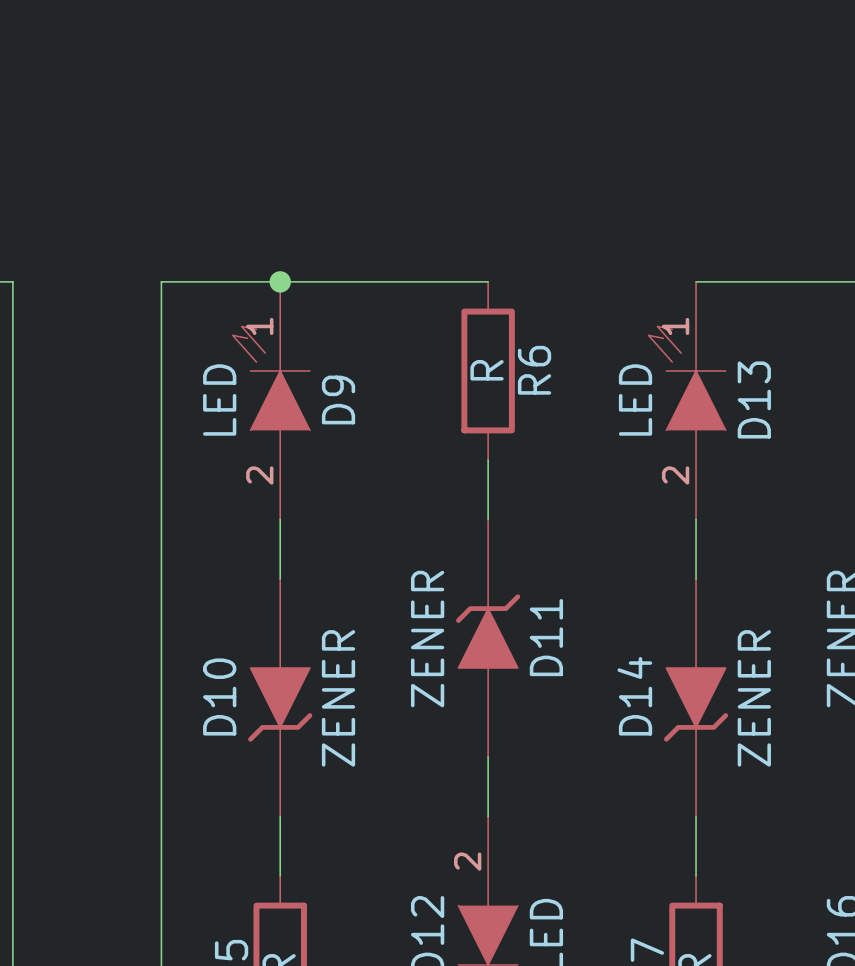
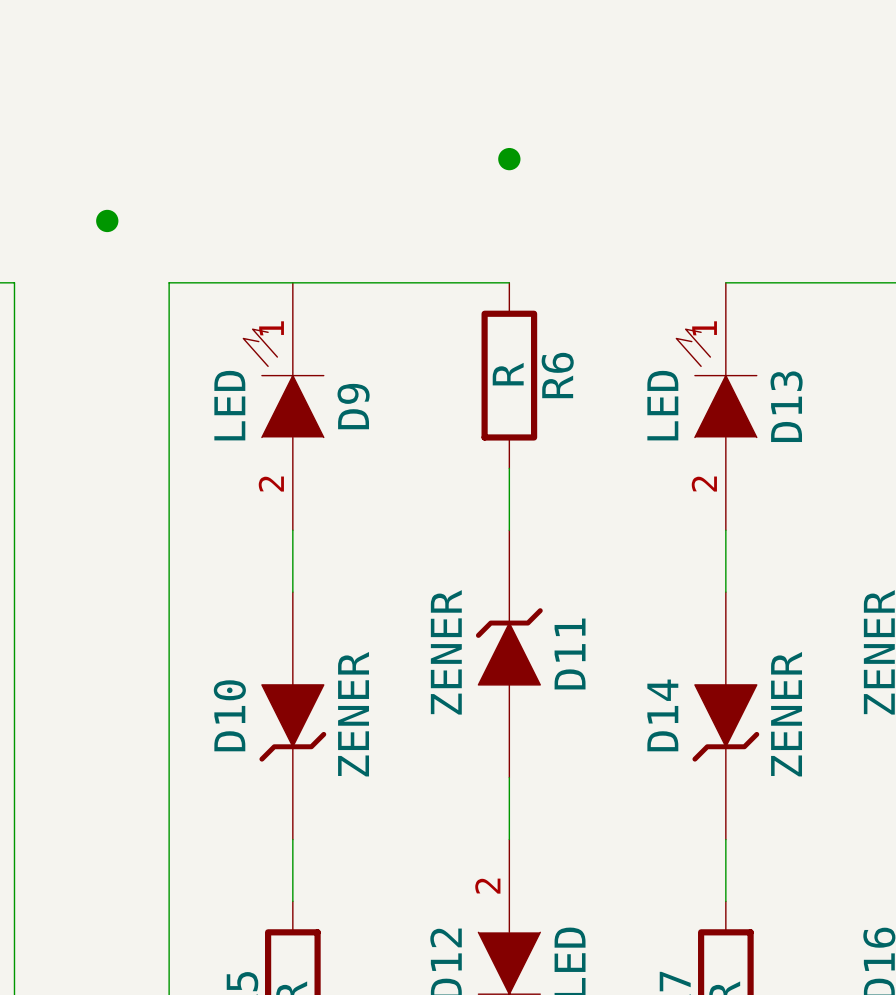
junction: none -> (509, 159)
junction: none -> (107, 220)
junction: (280, 281) -> none

